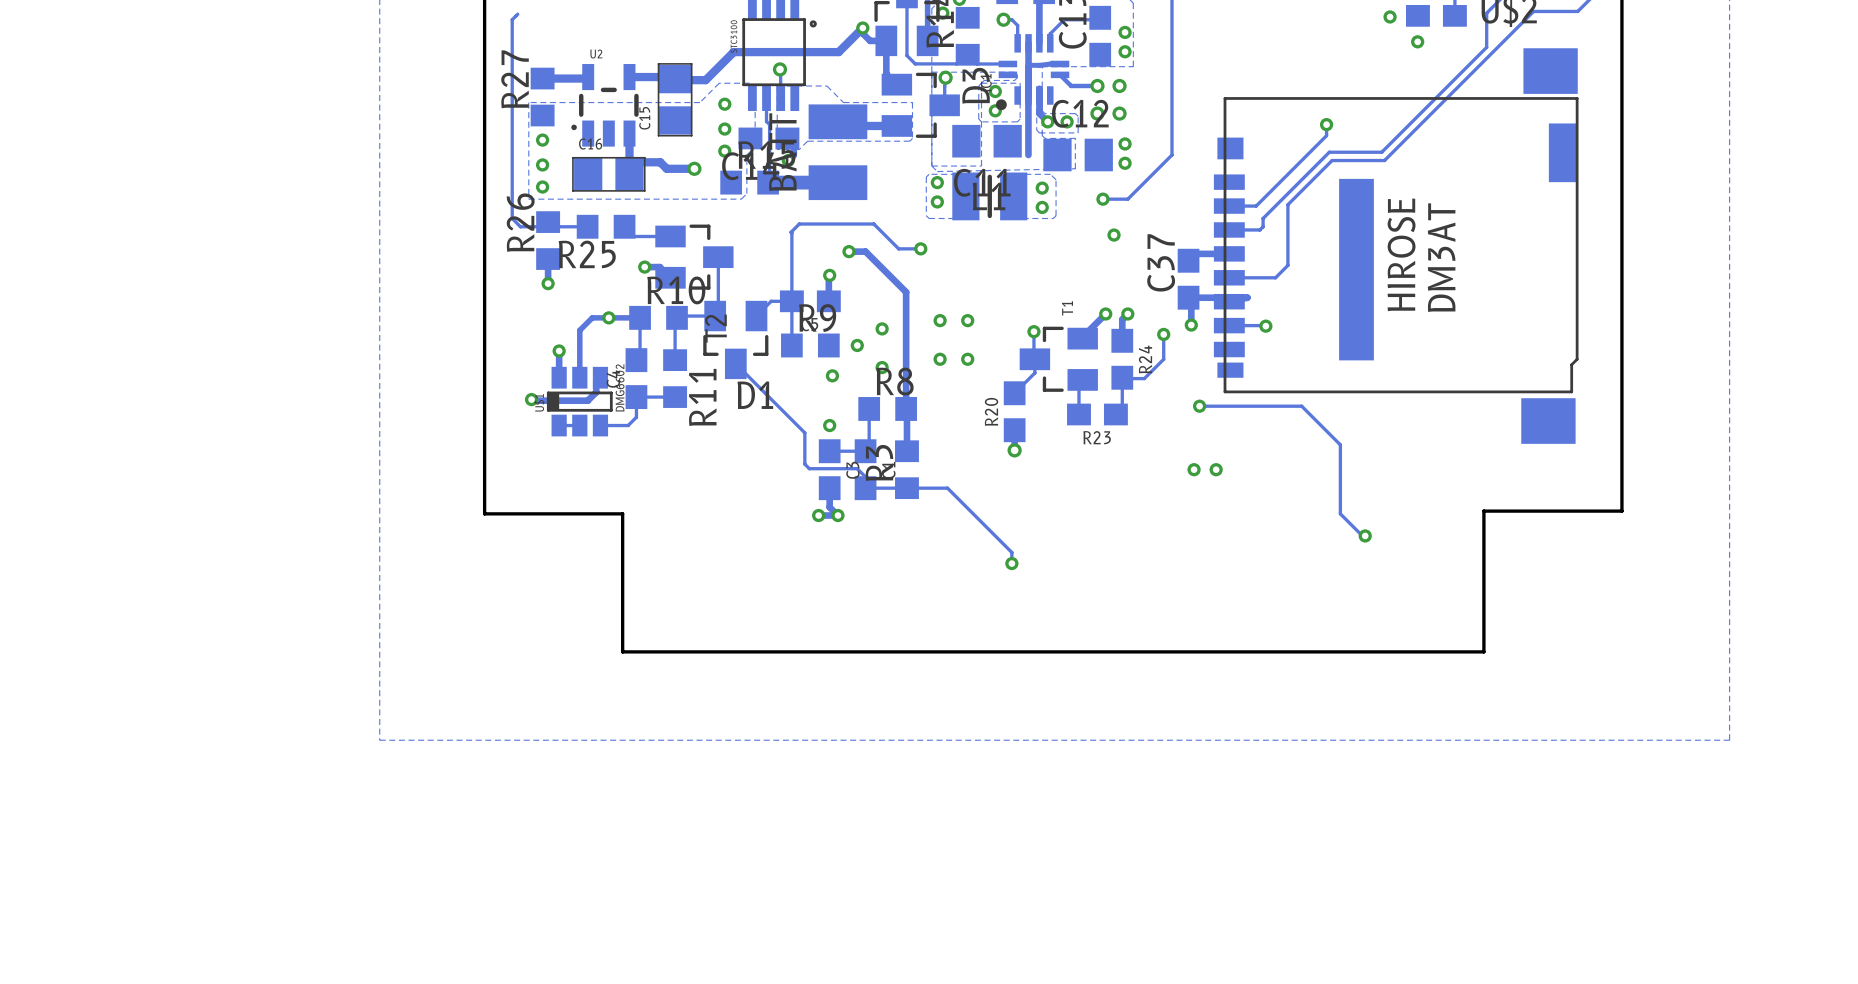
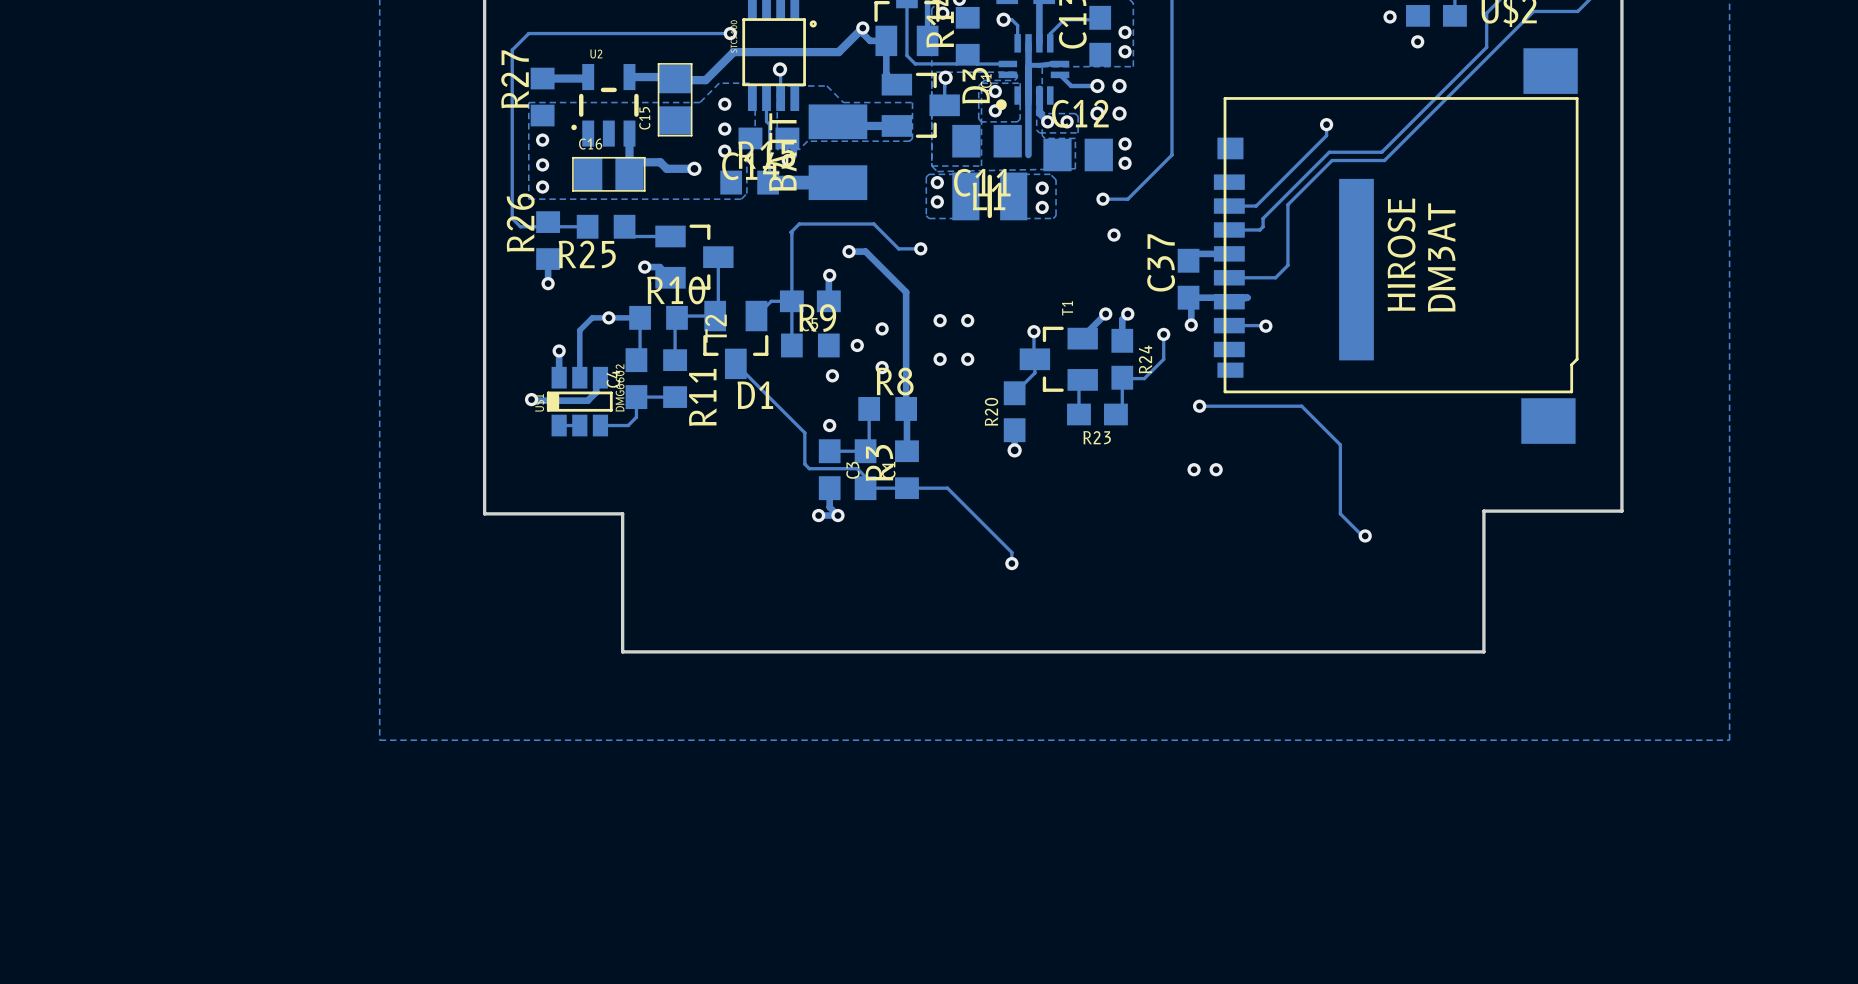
track: (517, 14) (512, 19) (512, 50) -> (730, 33) (528, 33) (512, 50)
via: none -> (730, 33)
part footprint: [1213, 48, 1579, 444] -> [1213, 48, 1579, 444]

